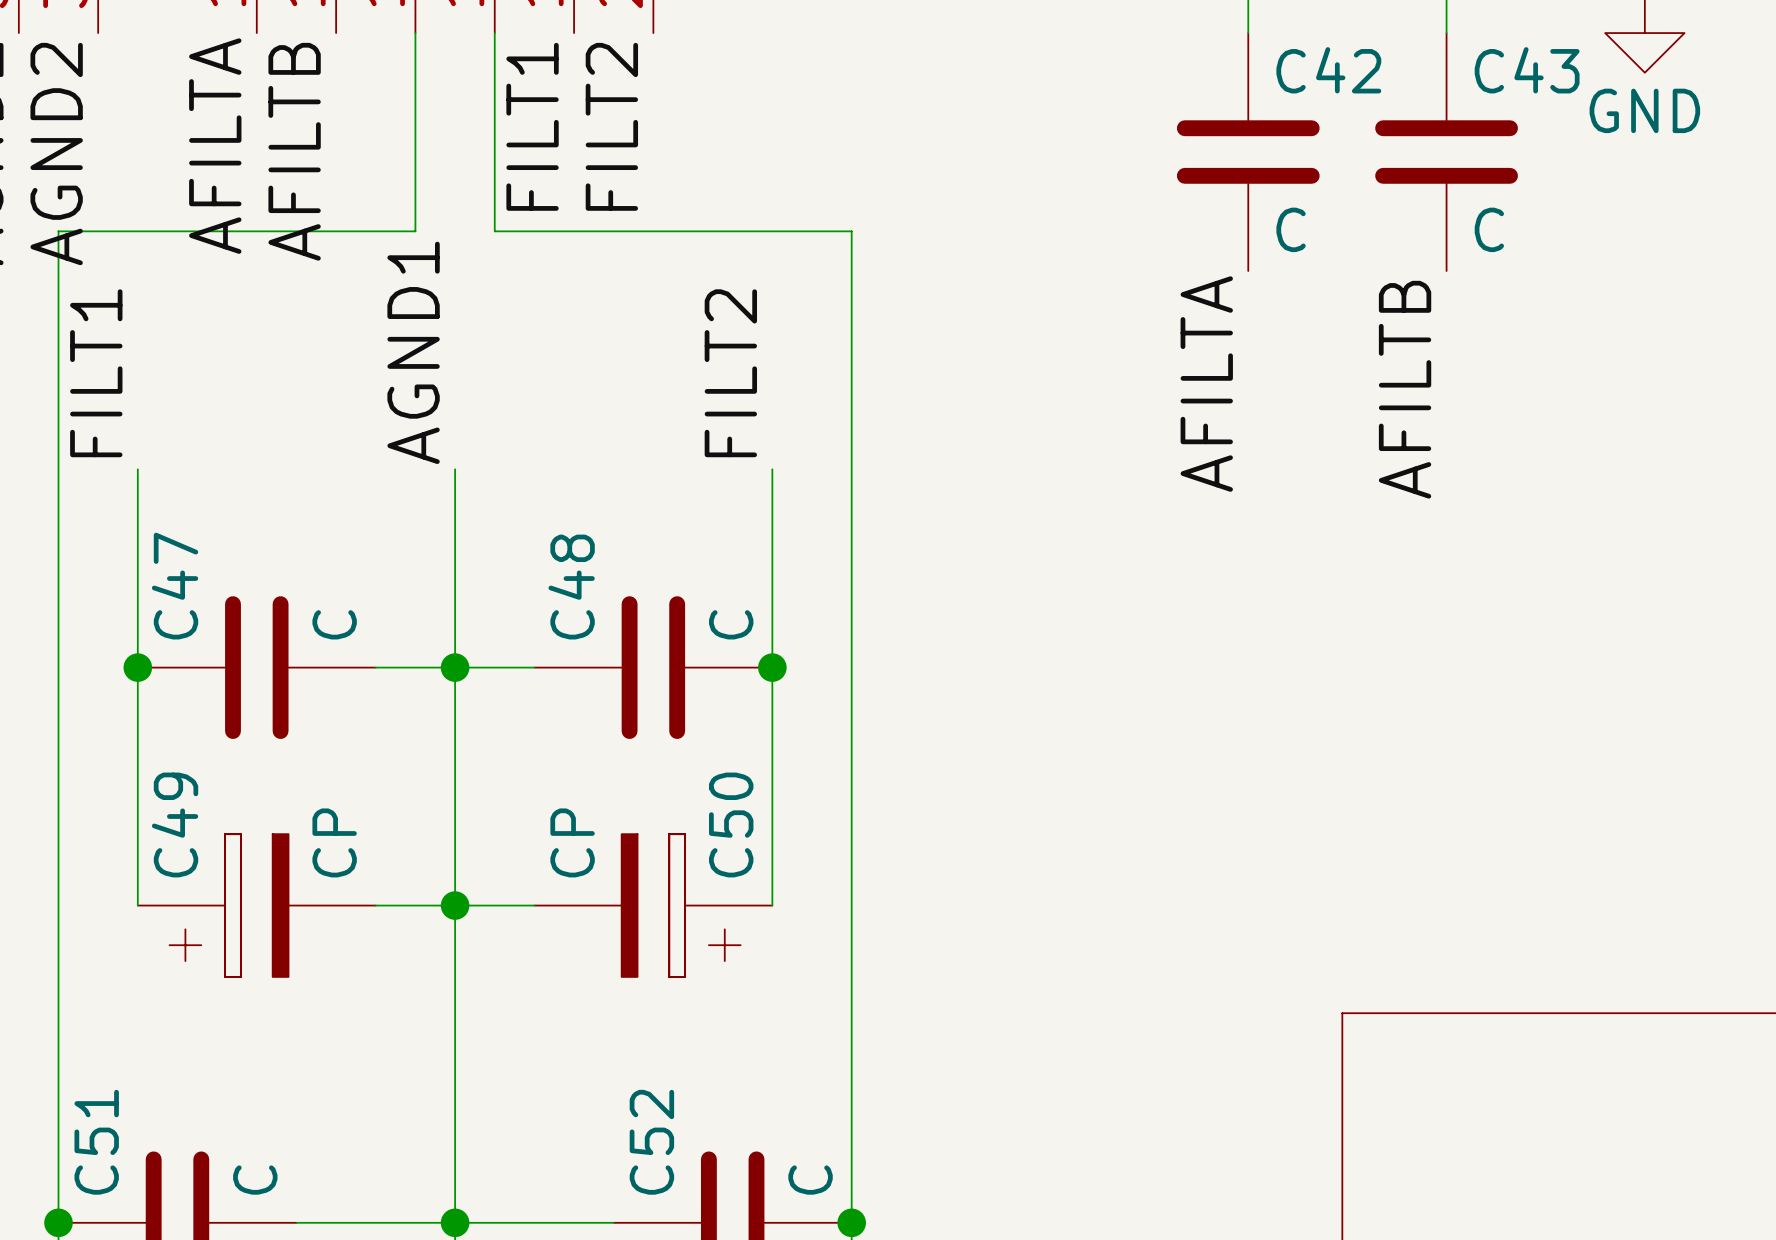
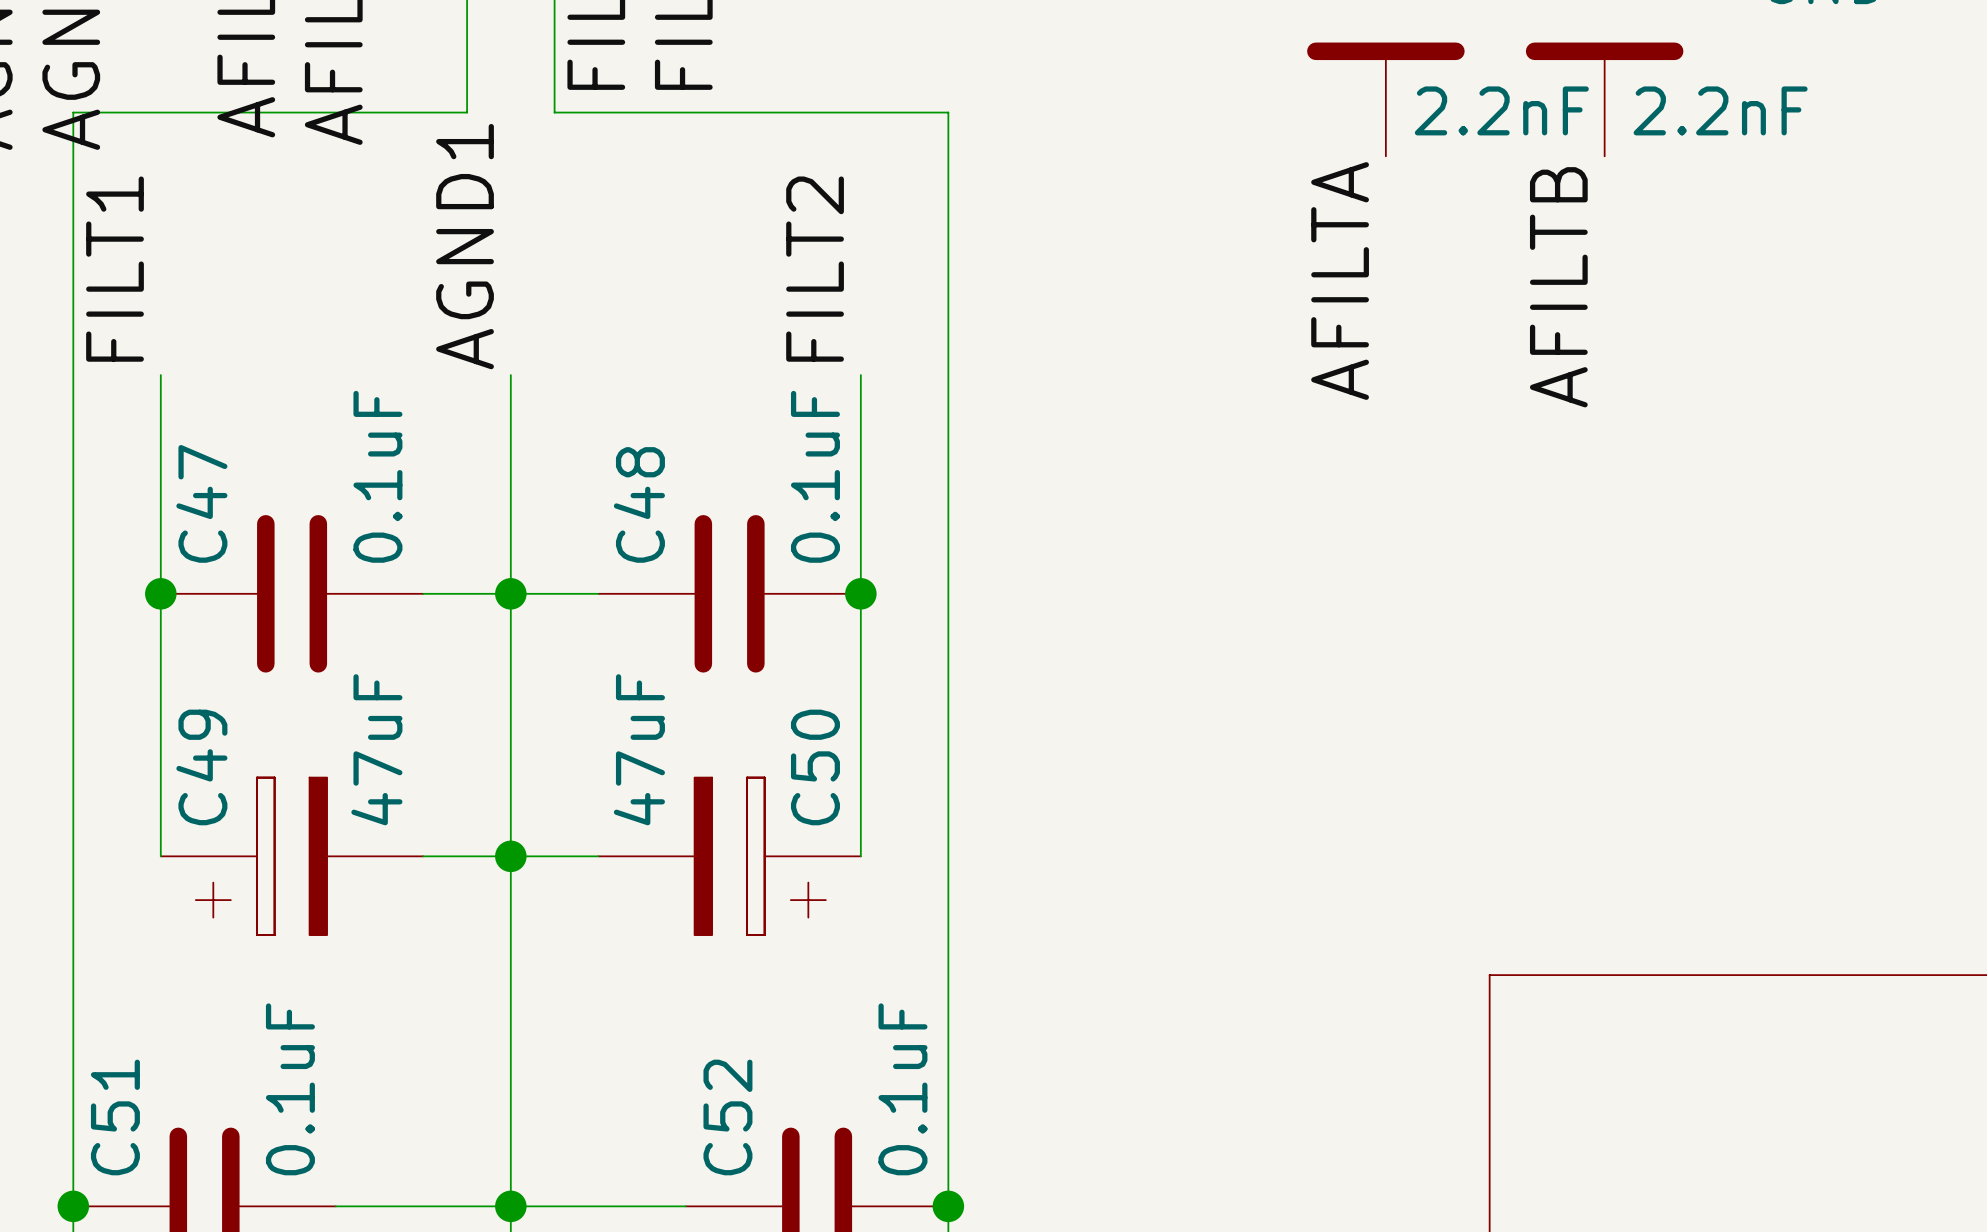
C42 value: C (1291, 229) -> 2.2nF (1501, 110)
C43 value: C (1489, 229) -> 2.2nF (1720, 110)
C47 value: C (334, 624) -> 0.1uF (377, 476)
C48 value: C (731, 624) -> 0.1uF (815, 476)
C49 value: CP (334, 842) -> 47uF (376, 749)
C50 value: CP (572, 842) -> 47uF (639, 749)
C51 value: C (255, 1180) -> 0.1uF (290, 1089)
C52 value: C (810, 1180) -> 0.1uF (902, 1089)

